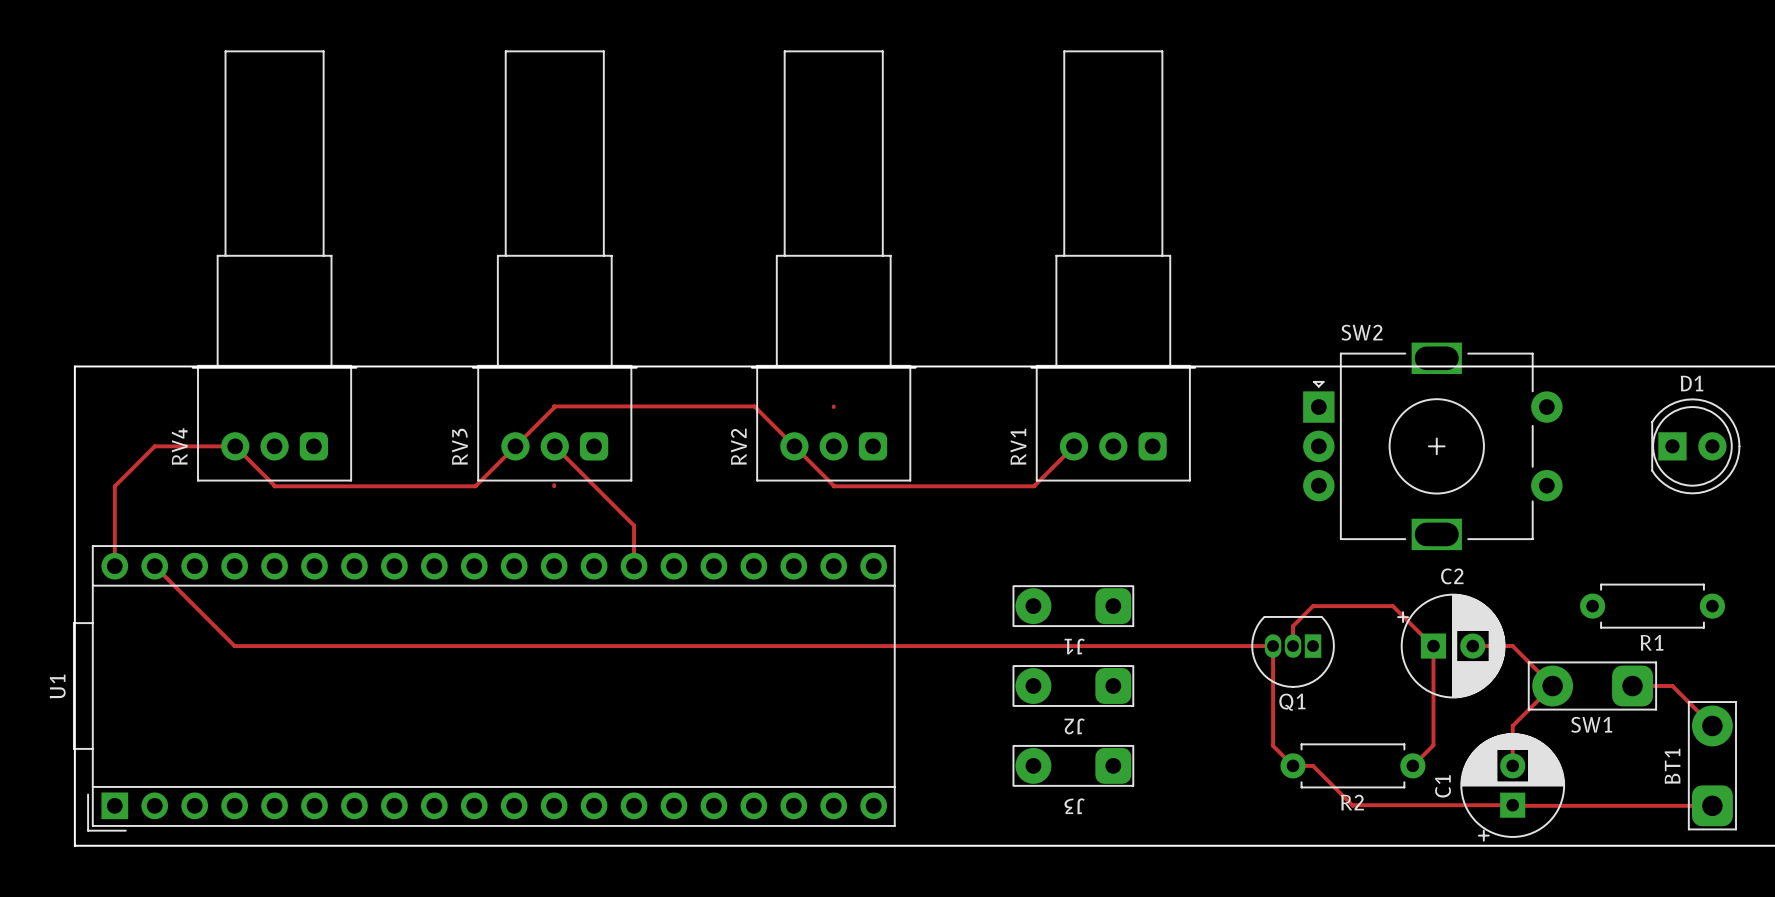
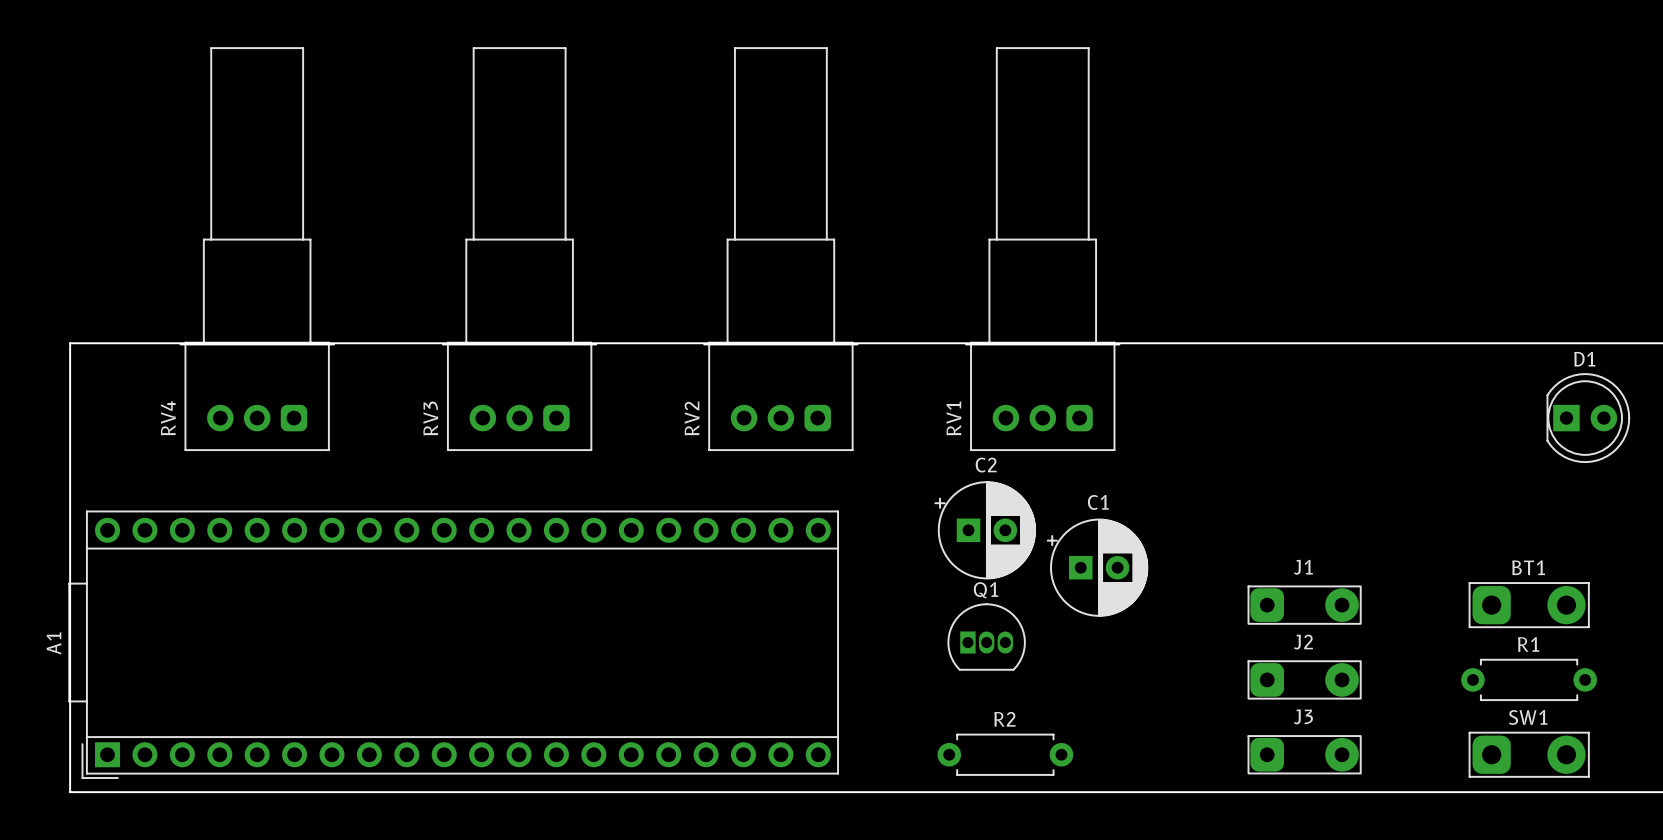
track: (833, 406) (833, 407) -> none
track: (554, 446) (634, 525) (634, 566) -> none
track: (1074, 446) (1034, 486) (833, 486) (754, 406) (554, 406) (475, 486) (274, 486) (235, 446) (154, 446) (114, 486) (115, 566) -> none
SW2: (1432, 446) -> none
track: (554, 485) (554, 486) -> none
track: (154, 566) (234, 646) (1273, 646) (1273, 745) (1293, 765) (1313, 765) (1352, 805) (1712, 805) -> none
J1 rotation: 0° (1073, 606) -> 180° (1304, 605)
J1 position: (1073, 606) -> (1304, 605)
R1 position: (1652, 606) -> (1529, 679)
R1 name position: R1 (1652, 642) -> R1 (1528, 644)
track: (1293, 646) (1293, 626) (1313, 606) (1392, 606) (1433, 646) (1433, 745) (1412, 765) -> none
C2 position: (1451, 646) -> (985, 530)
track: (1472, 646) (1512, 646) (1552, 686) (1512, 725) (1512, 765) -> none
Q1 rotation: 0° (1293, 651) -> 180° (986, 637)
Q1 position: (1293, 651) -> (986, 637)
U1 name: U1 (57, 686) -> A1 (53, 643)
J2 rotation: 0° (1073, 686) -> 180° (1304, 679)
J2 position: (1073, 686) -> (1304, 679)
SW1 rotation: 0° (1592, 686) -> 180° (1529, 754)
SW1 position: (1592, 686) -> (1529, 754)
track: (1632, 686) (1672, 686) (1712, 725) -> none
J3 rotation: 0° (1073, 765) -> 180° (1304, 754)
J3 position: (1073, 765) -> (1304, 754)
R2 position: (1352, 765) -> (1005, 754)
BT1 rotation: 0° (1712, 765) -> 90° clockwise (1529, 605)
BT1 position: (1712, 765) -> (1529, 605)
C1 rotation: 0° (1512, 787) -> 90° clockwise (1097, 567)
C1 position: (1512, 787) -> (1097, 567)
R2 name position: R2 (1352, 802) -> R2 (1004, 719)

